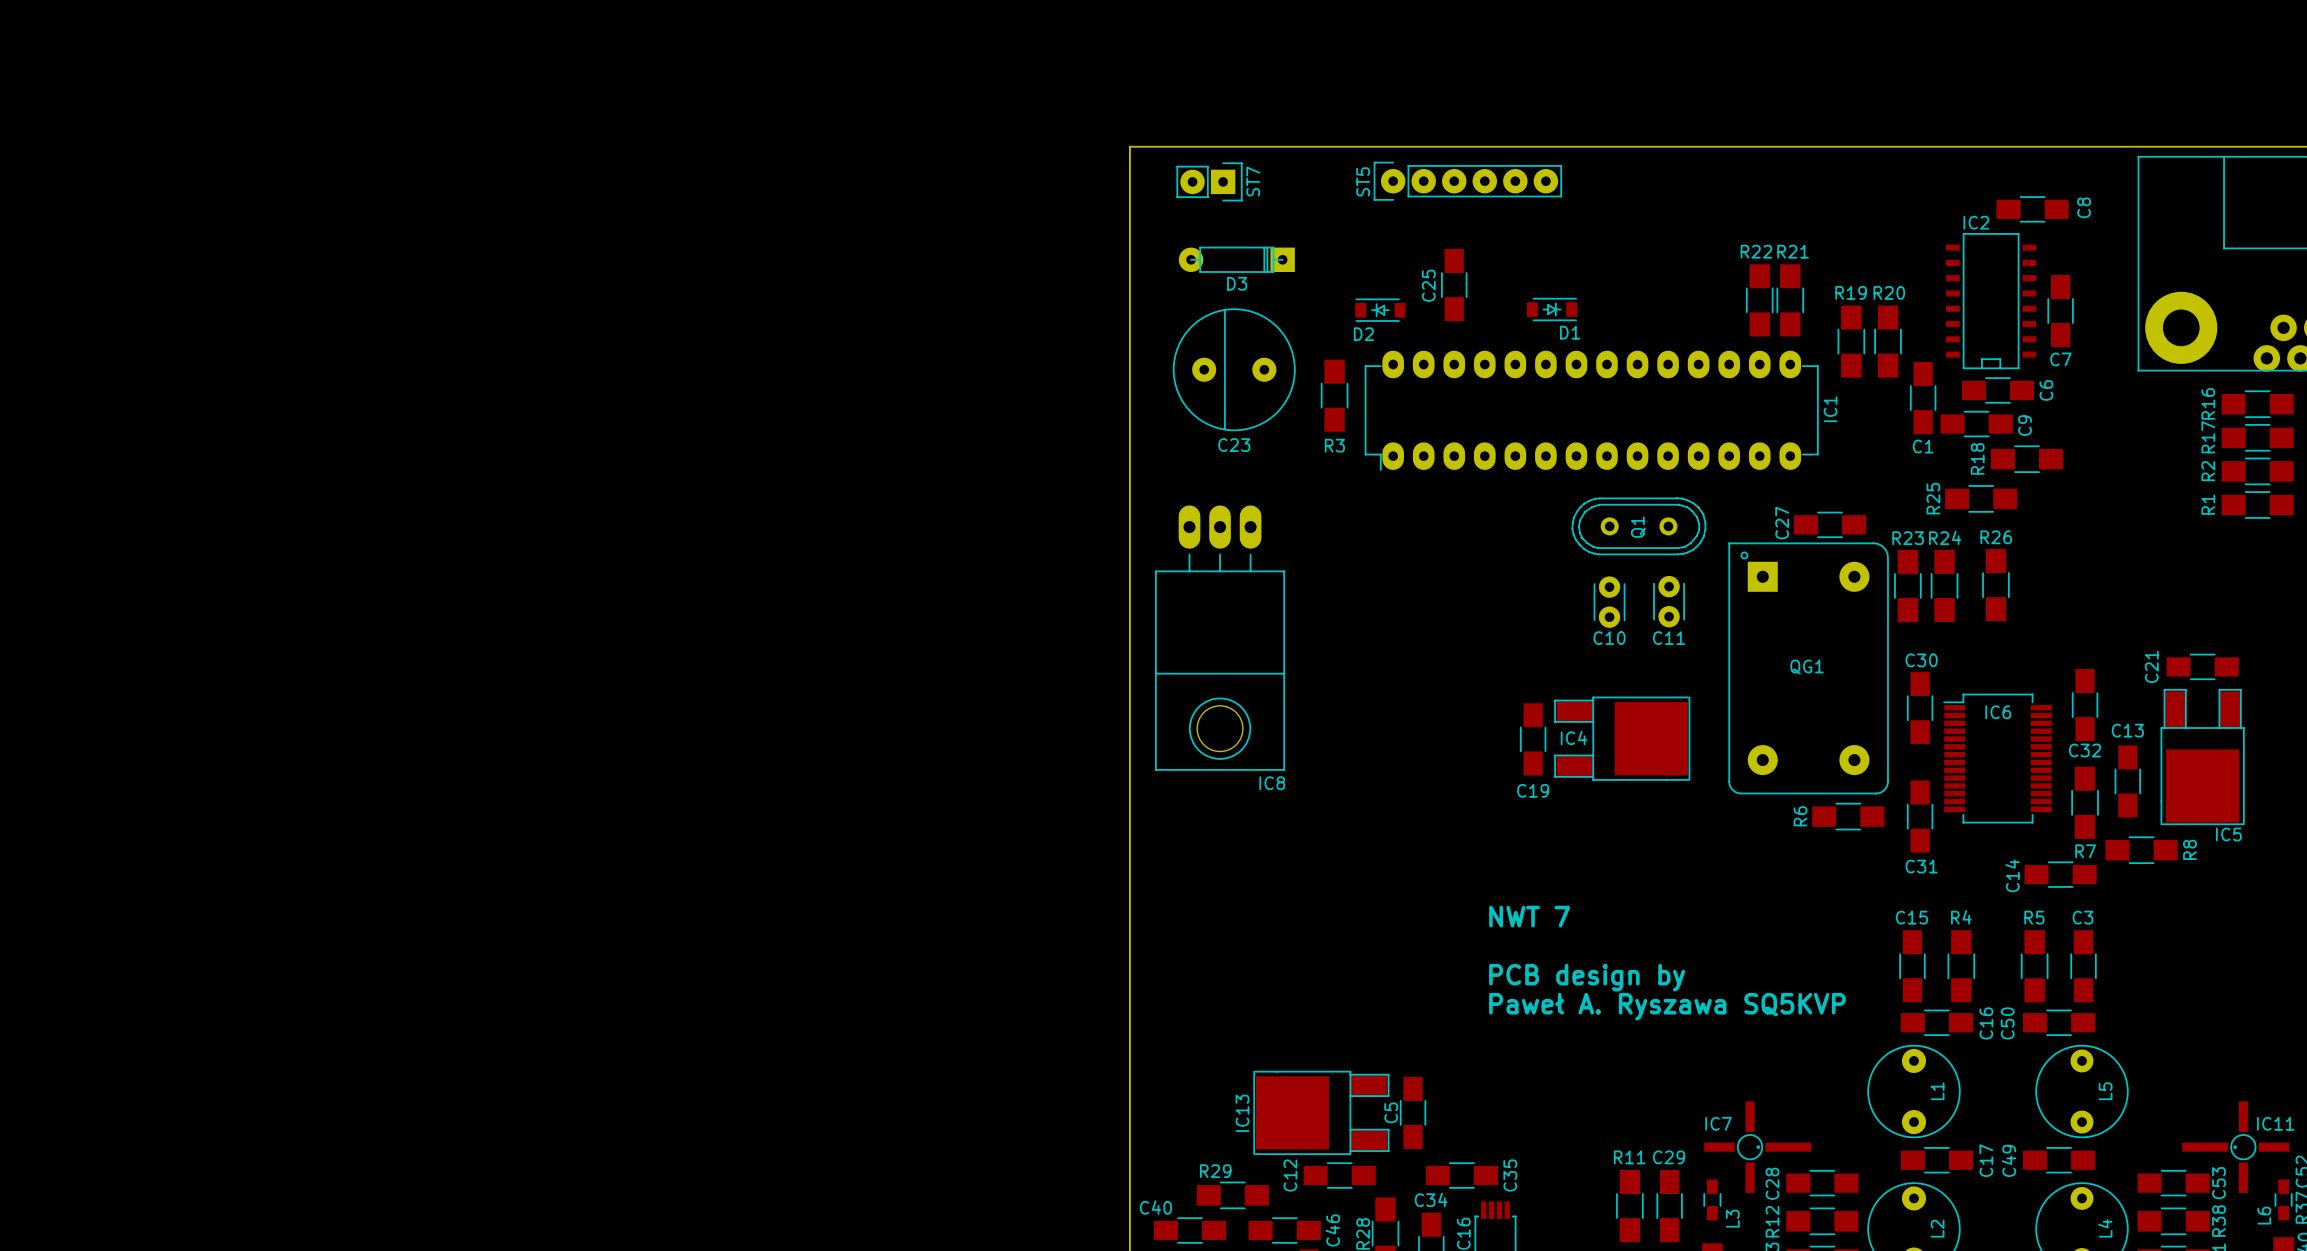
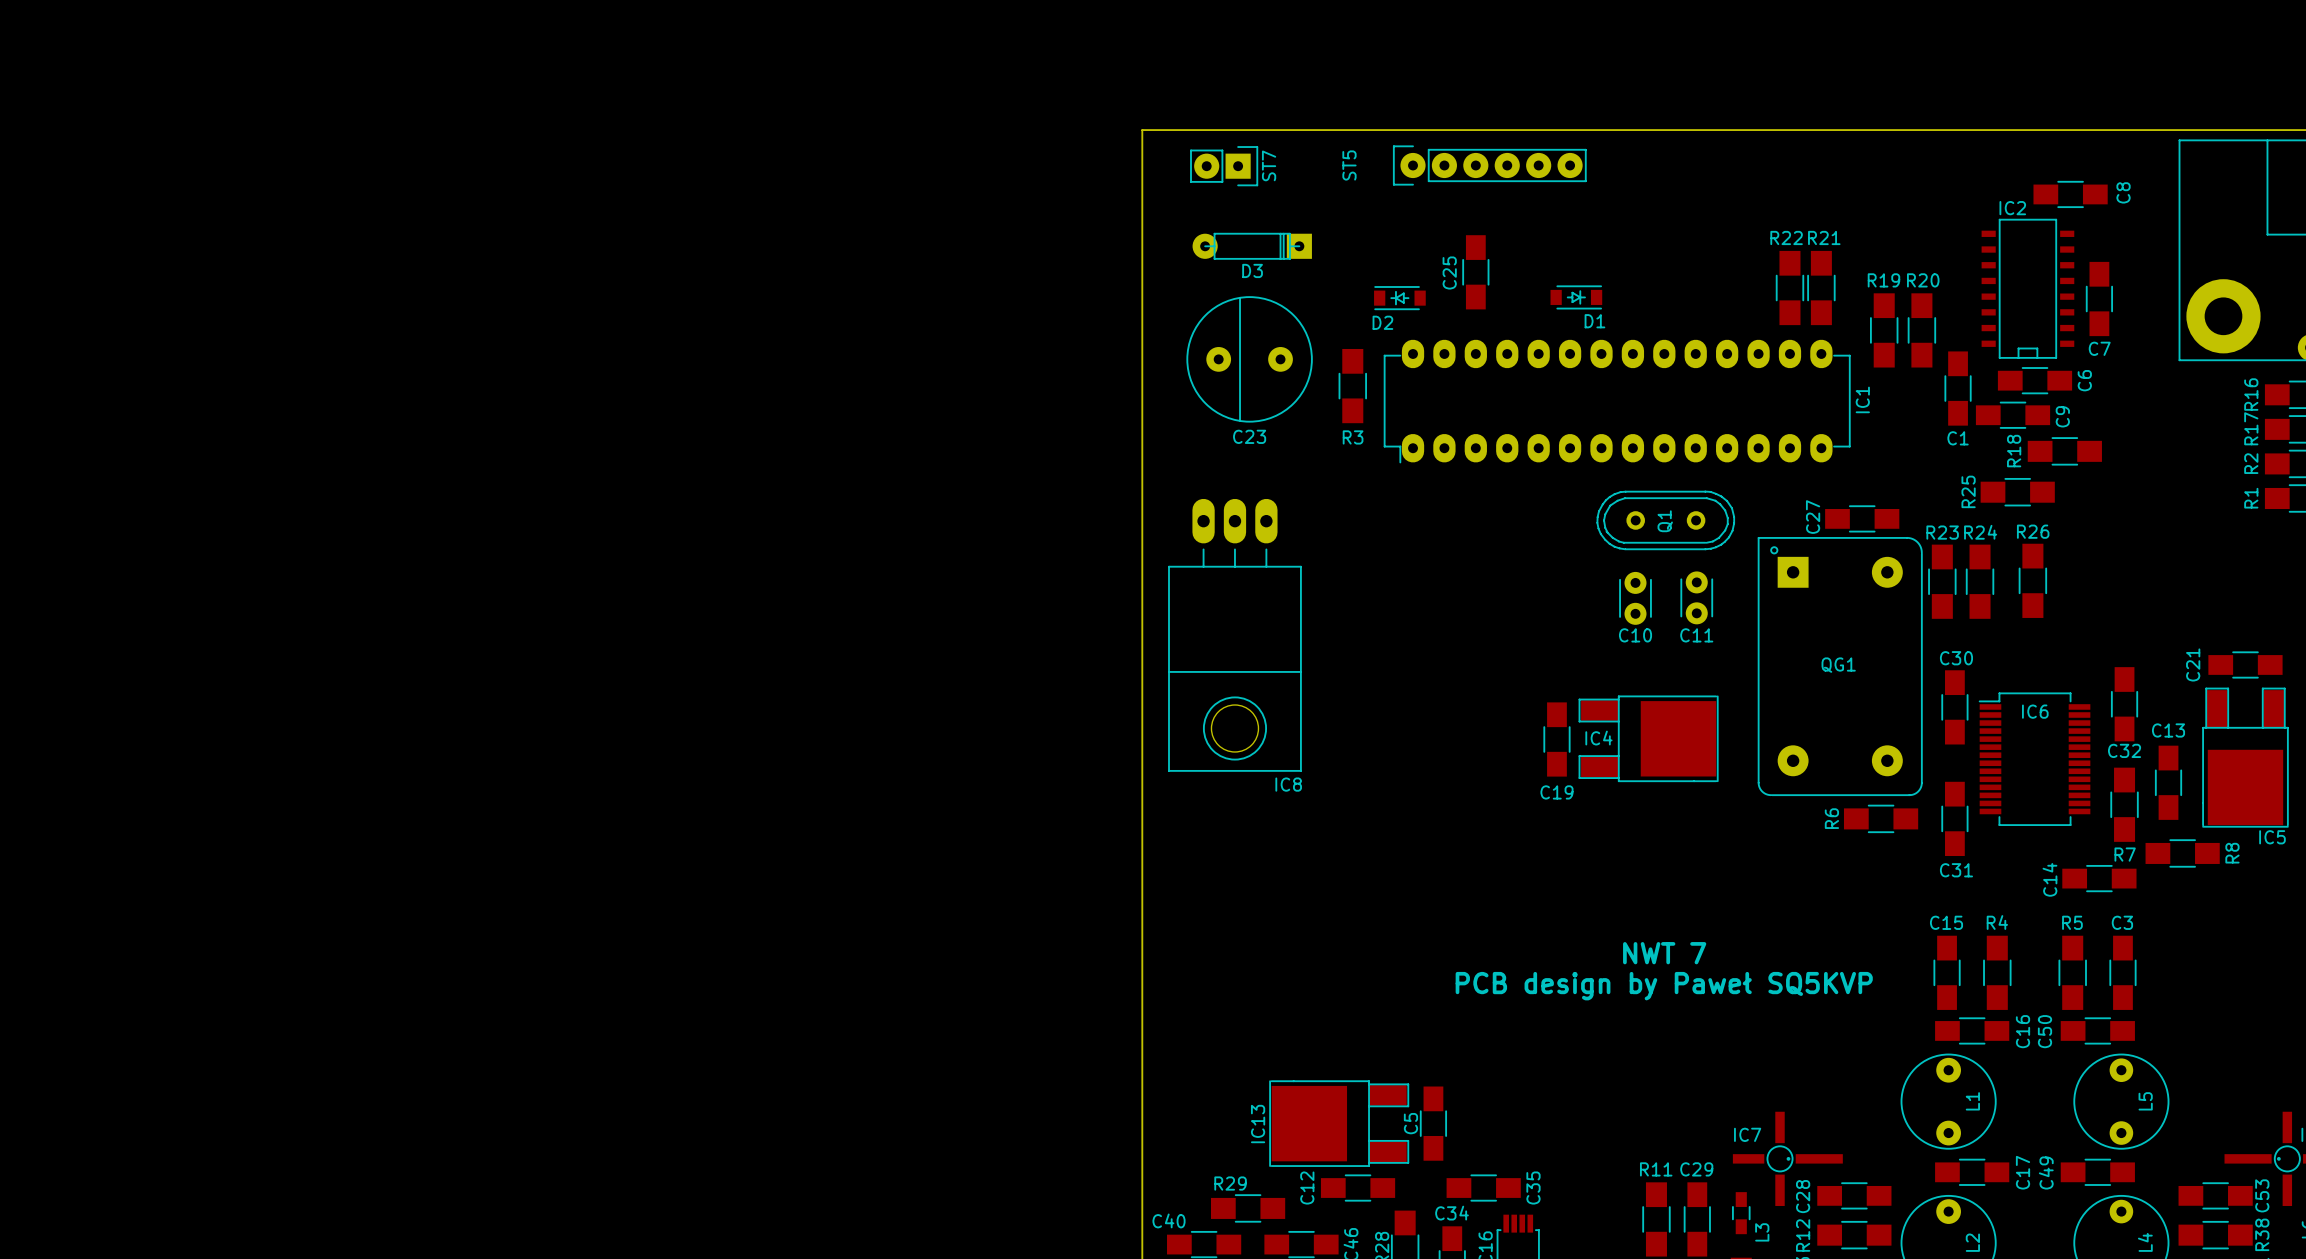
ST5 name position: ST5 (1363, 181) -> ST5 (1349, 165)
text position: NWT 7 (1529, 916) -> NWT 7 (1664, 953)
text: PCB design by (1587, 977) -> PCB design by Paweł SQ5KVP (1664, 986)
text: Paweł A. Ryszawa SQ5KVP (1667, 1006) -> none

